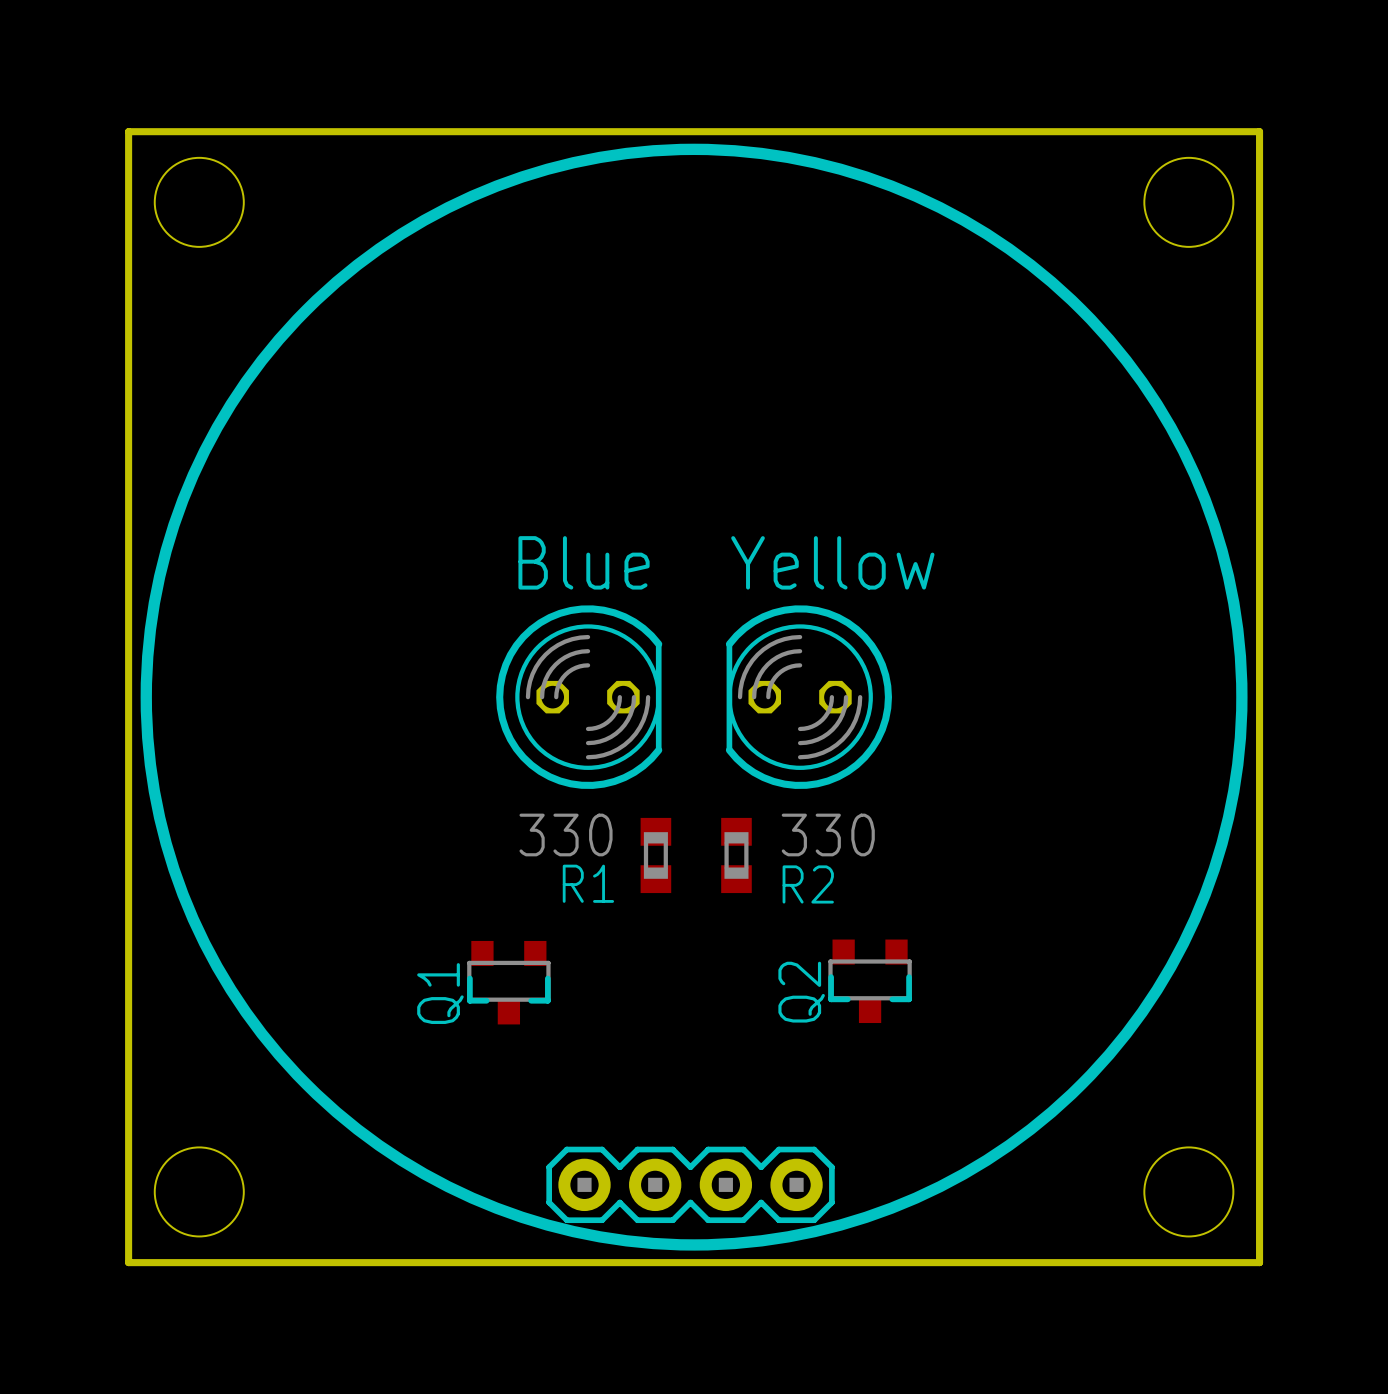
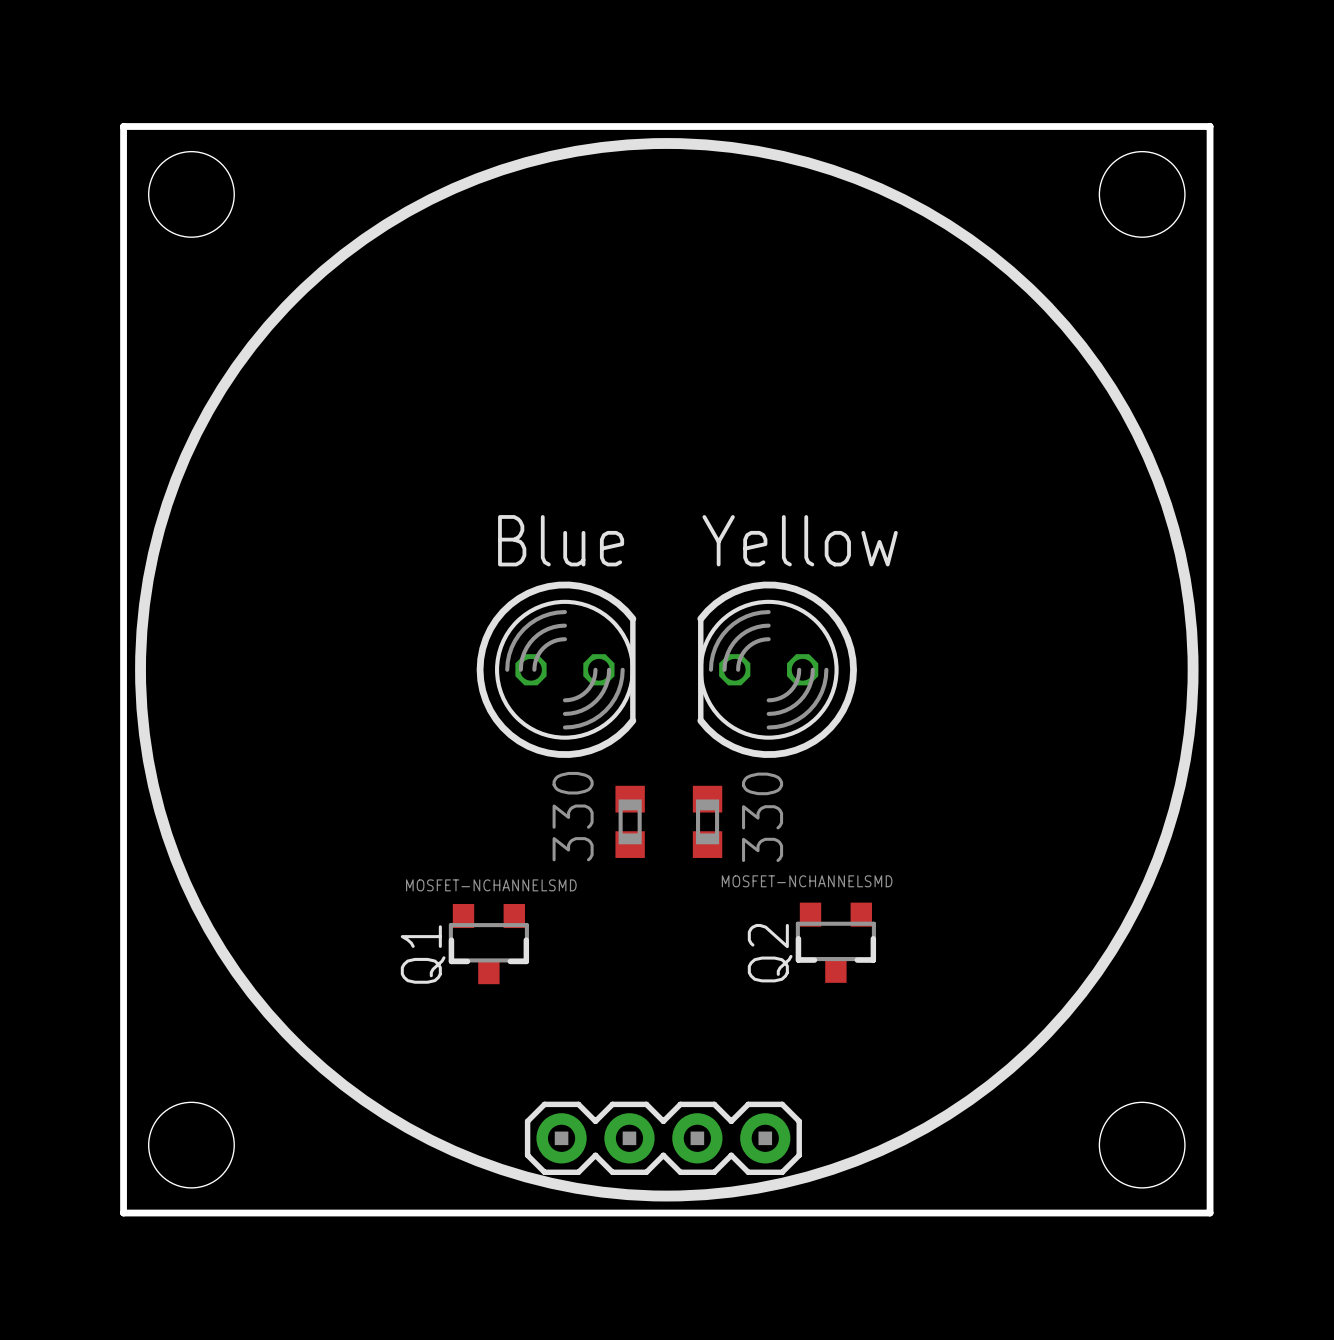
R1 value rotation: 0° (566, 834) -> 90° counterclockwise (573, 816)
R2 value rotation: 0° (828, 834) -> 90° counterclockwise (762, 817)
R1 name: R1 (588, 883) -> none
R2 name: R2 (808, 884) -> none
Q2 value: none -> MOSFET-NCHANNELSMD (807, 881)
Q1 value: none -> MOSFET-NCHANNELSMD (491, 885)

